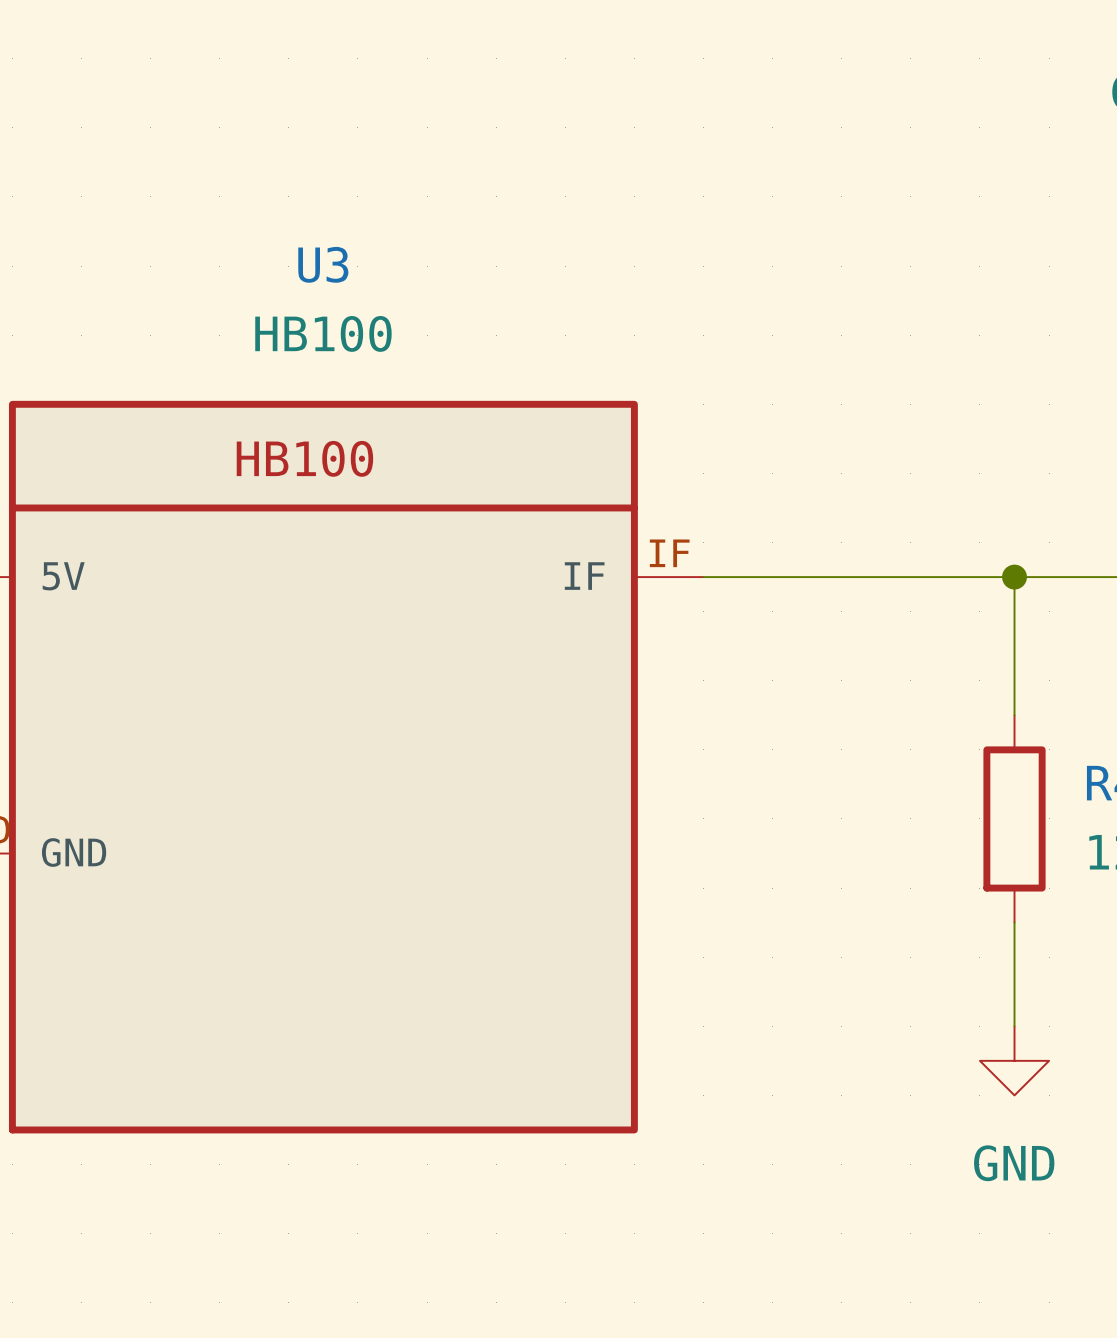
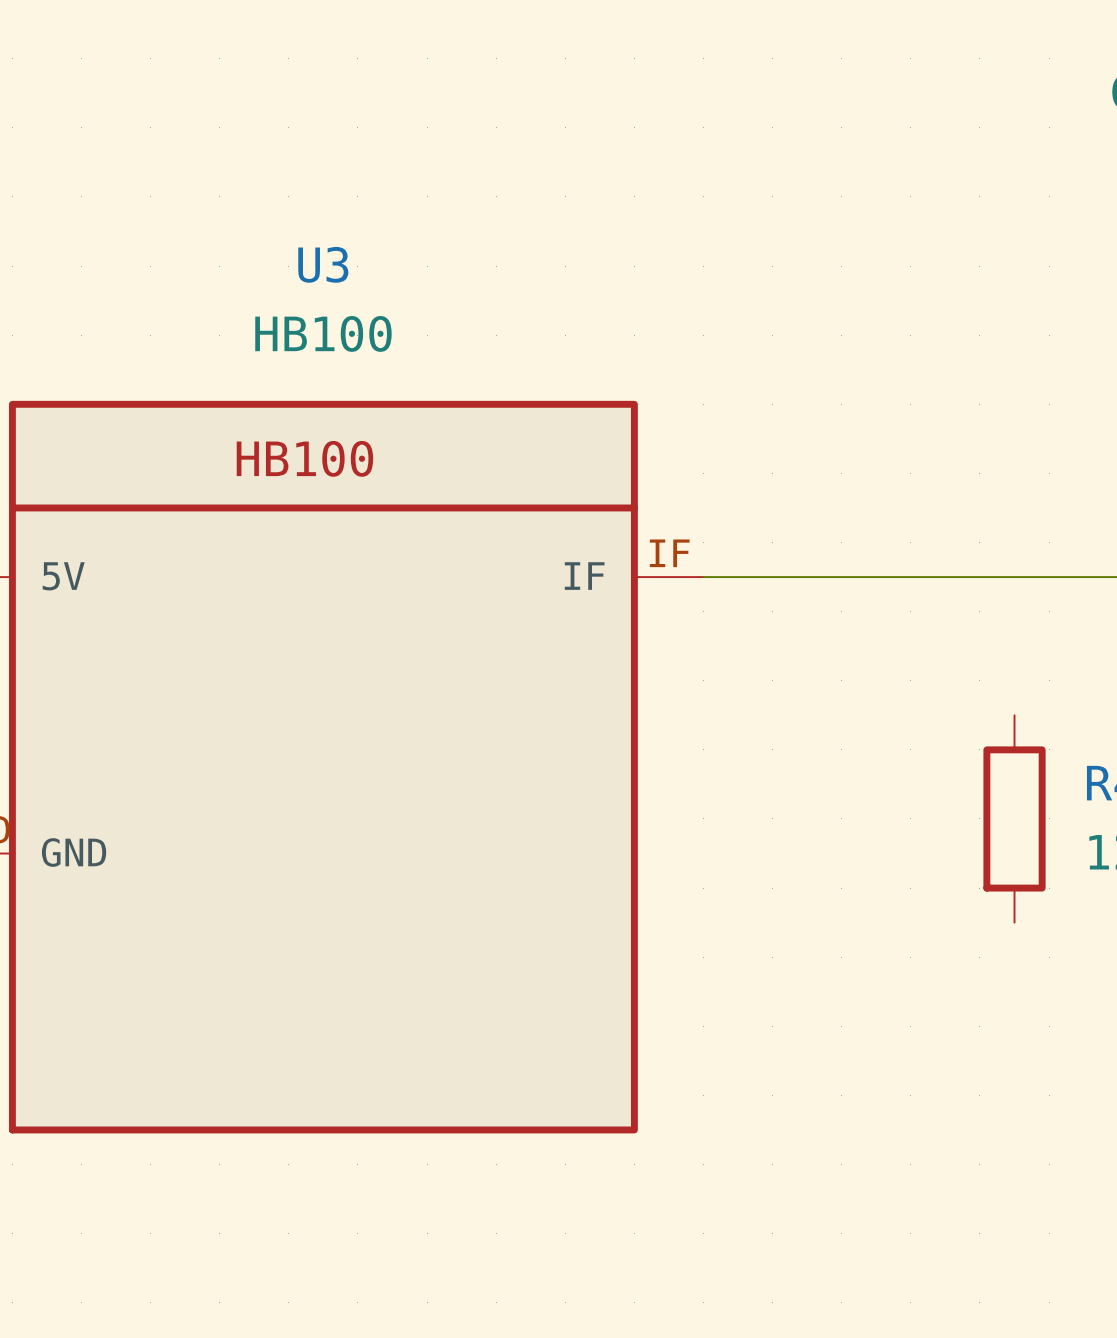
wire: (1014, 577) (1014, 715) -> none
junction: (1014, 577) -> none
wire: (1014, 922) (1014, 1026) -> none
power symbol: GND (1014, 1060) -> none

